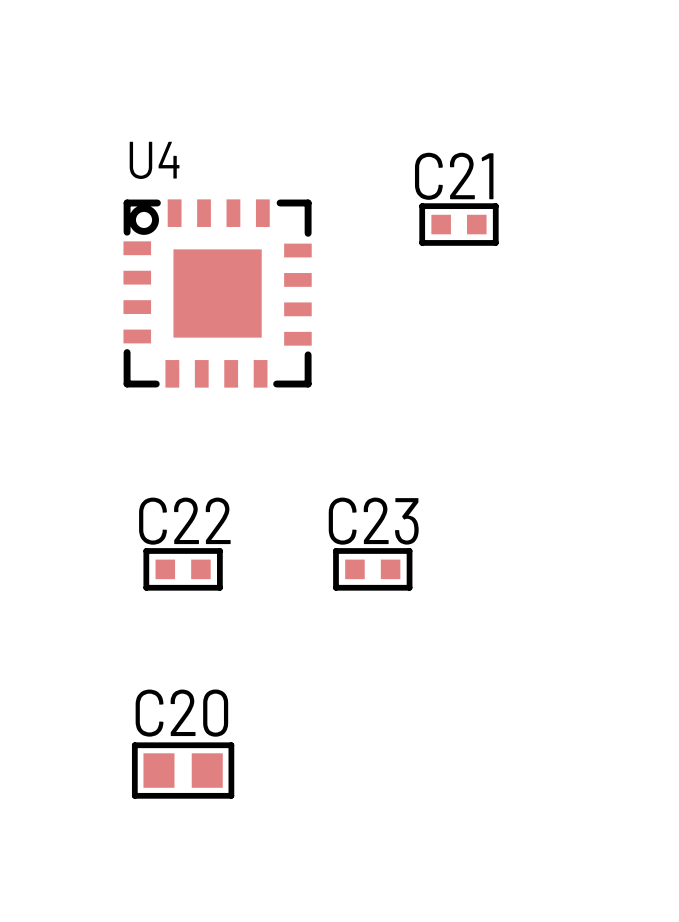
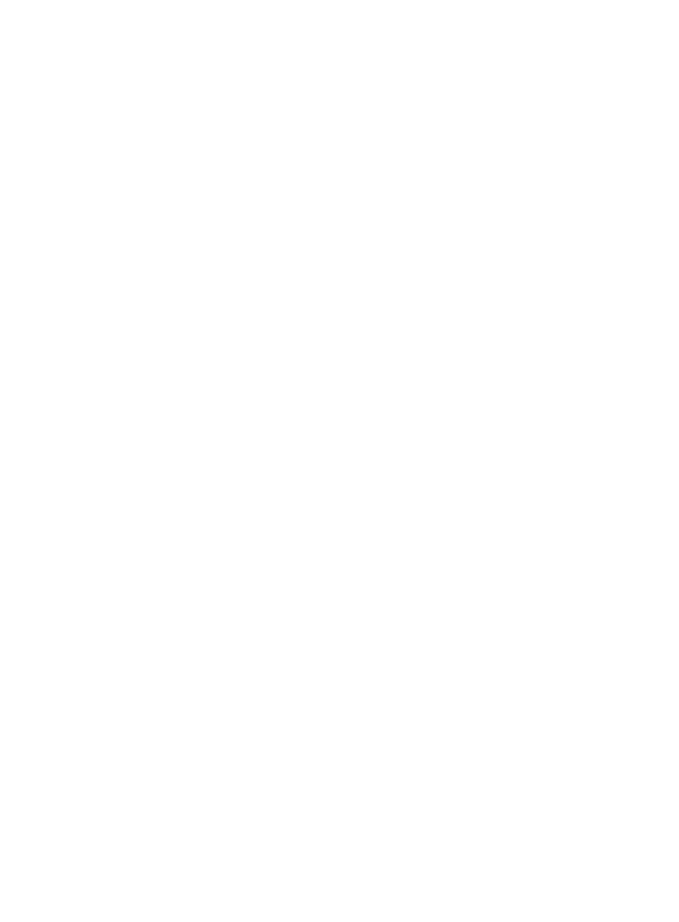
C21: (458, 224) -> none
U4: (217, 293) -> none
C22: (183, 569) -> none
C23: (372, 569) -> none
C20: (183, 770) -> none

